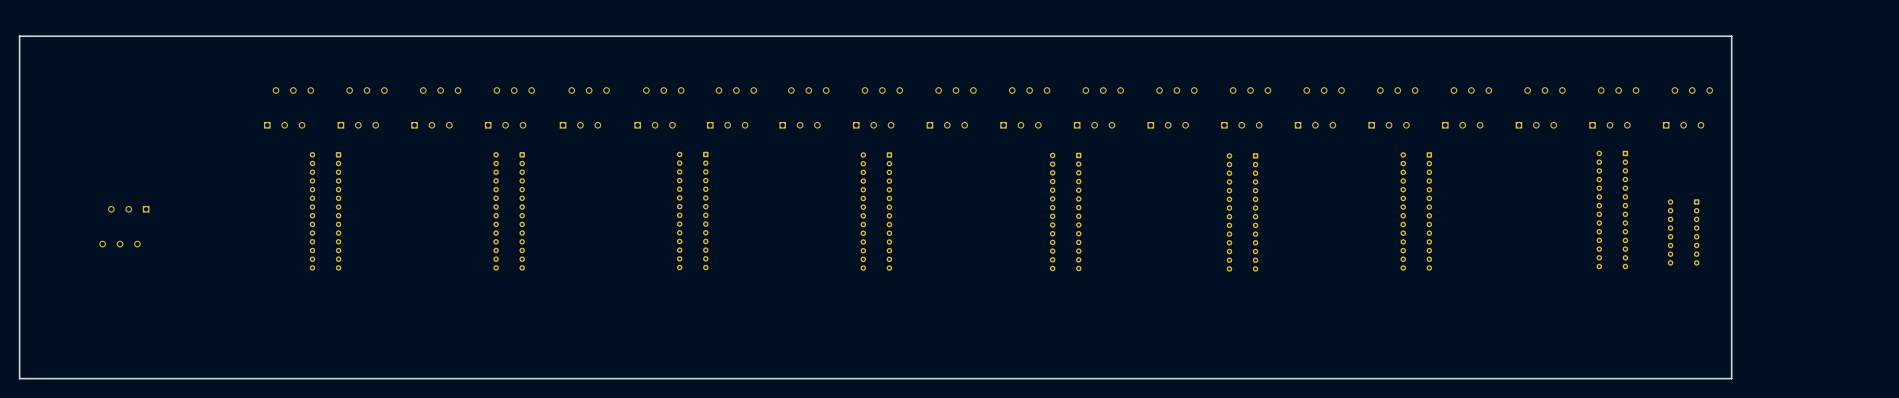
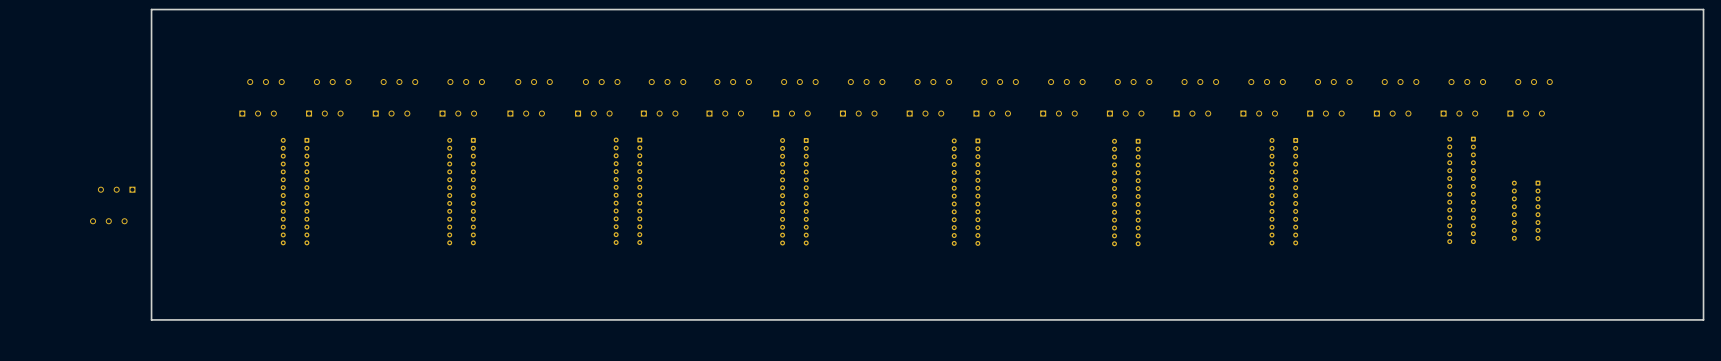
board edge: (1731, 36) (19, 36) (19, 378) (1731, 378) (1731, 36) -> (1703, 9) (151, 9) (151, 319) (1703, 319) (1703, 9)

